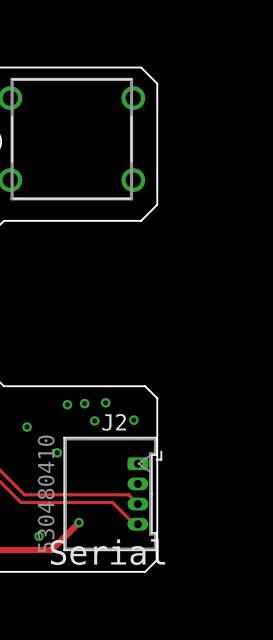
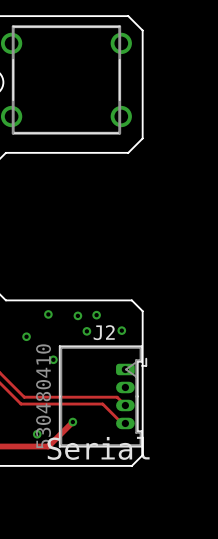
via position: (67, 404) -> (48, 314)

